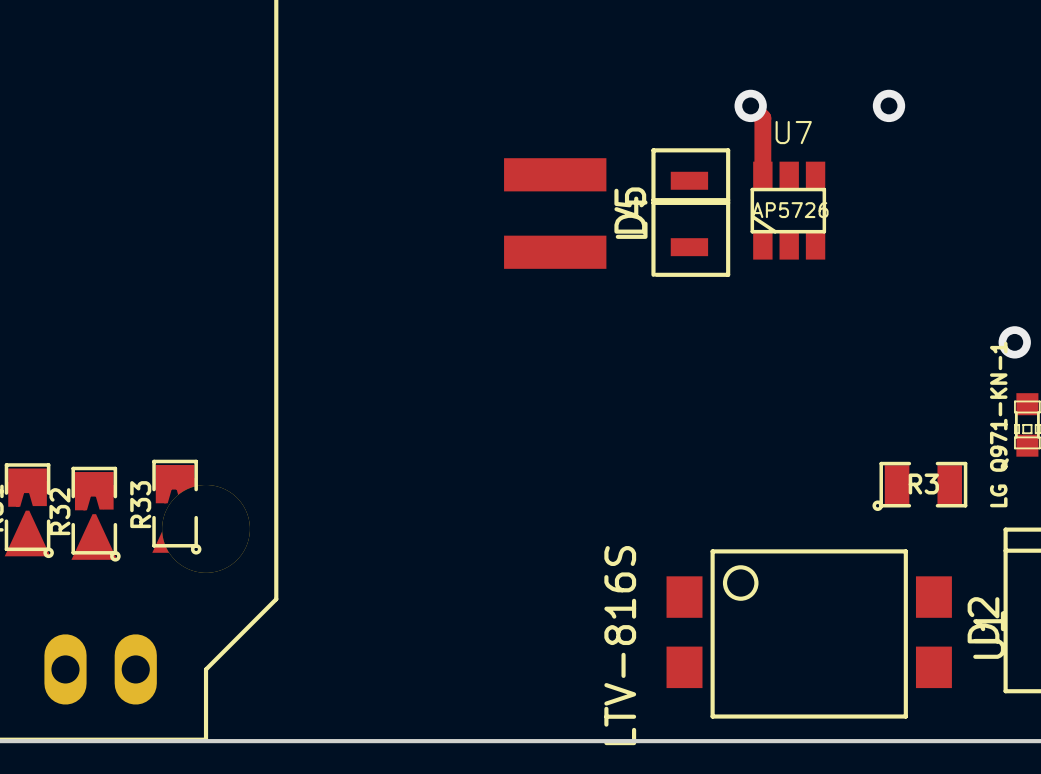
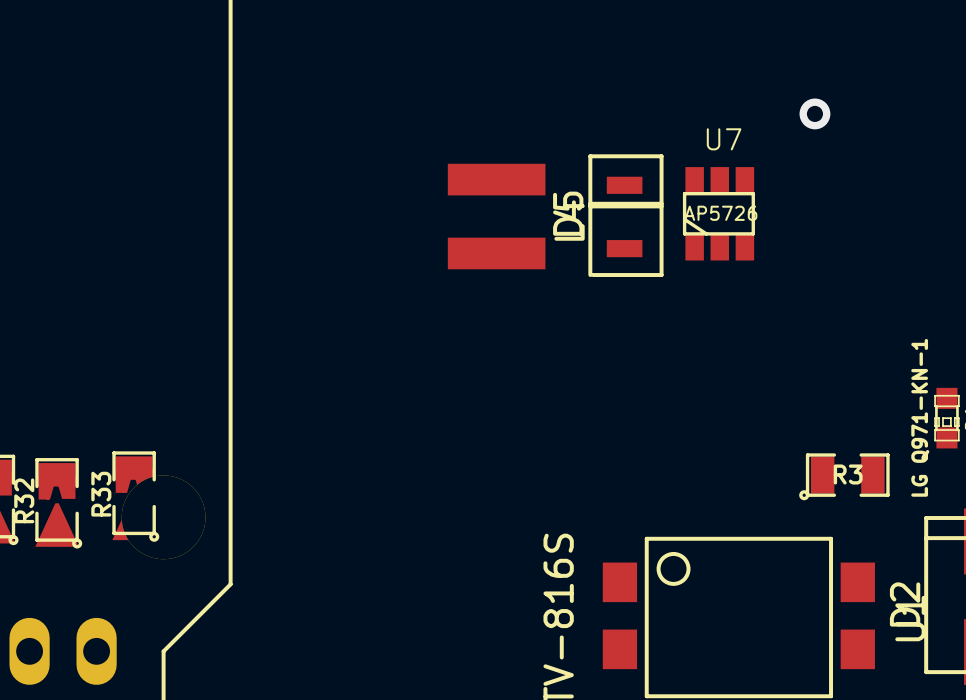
track: (750, 105) (762, 118) (762, 175) -> none
via: (750, 105) -> none
via: (1014, 342) -> none

